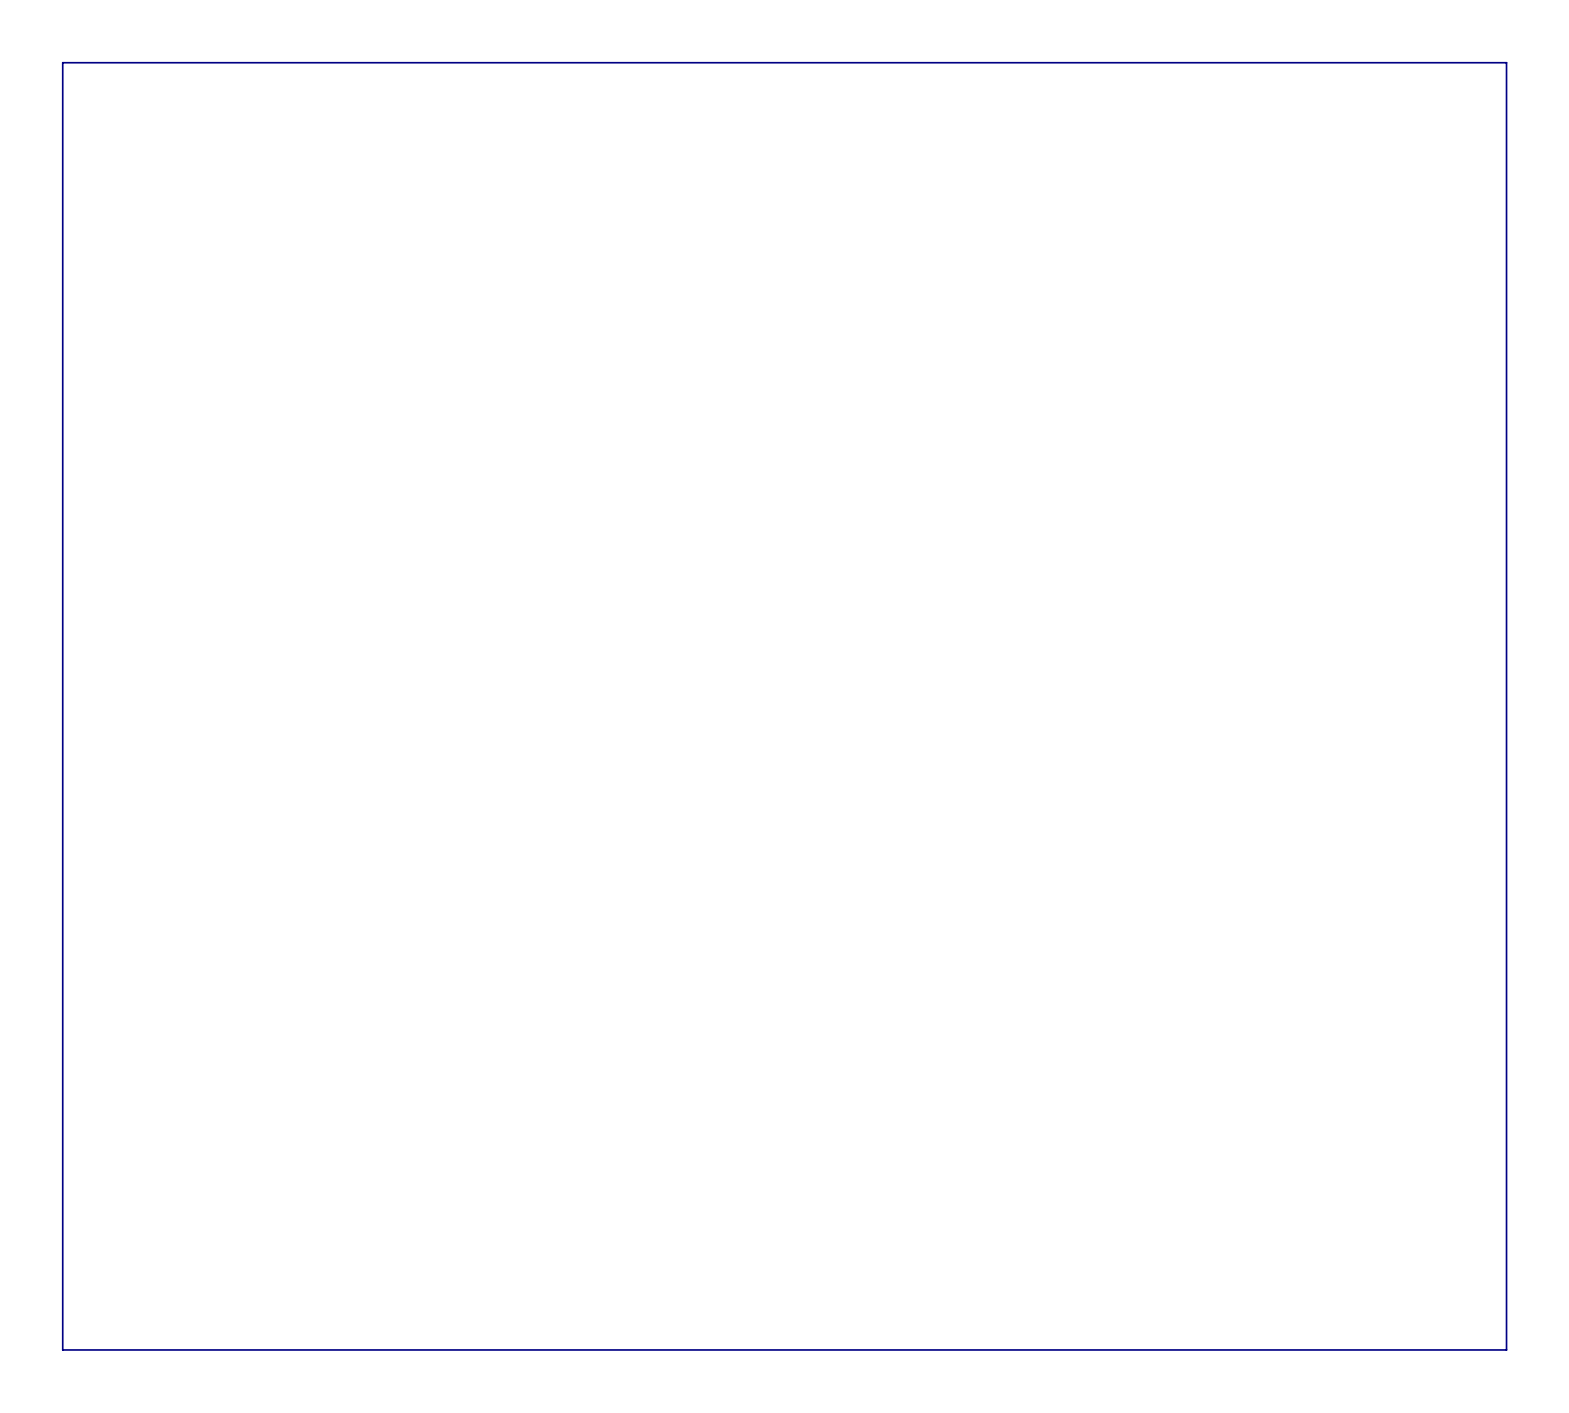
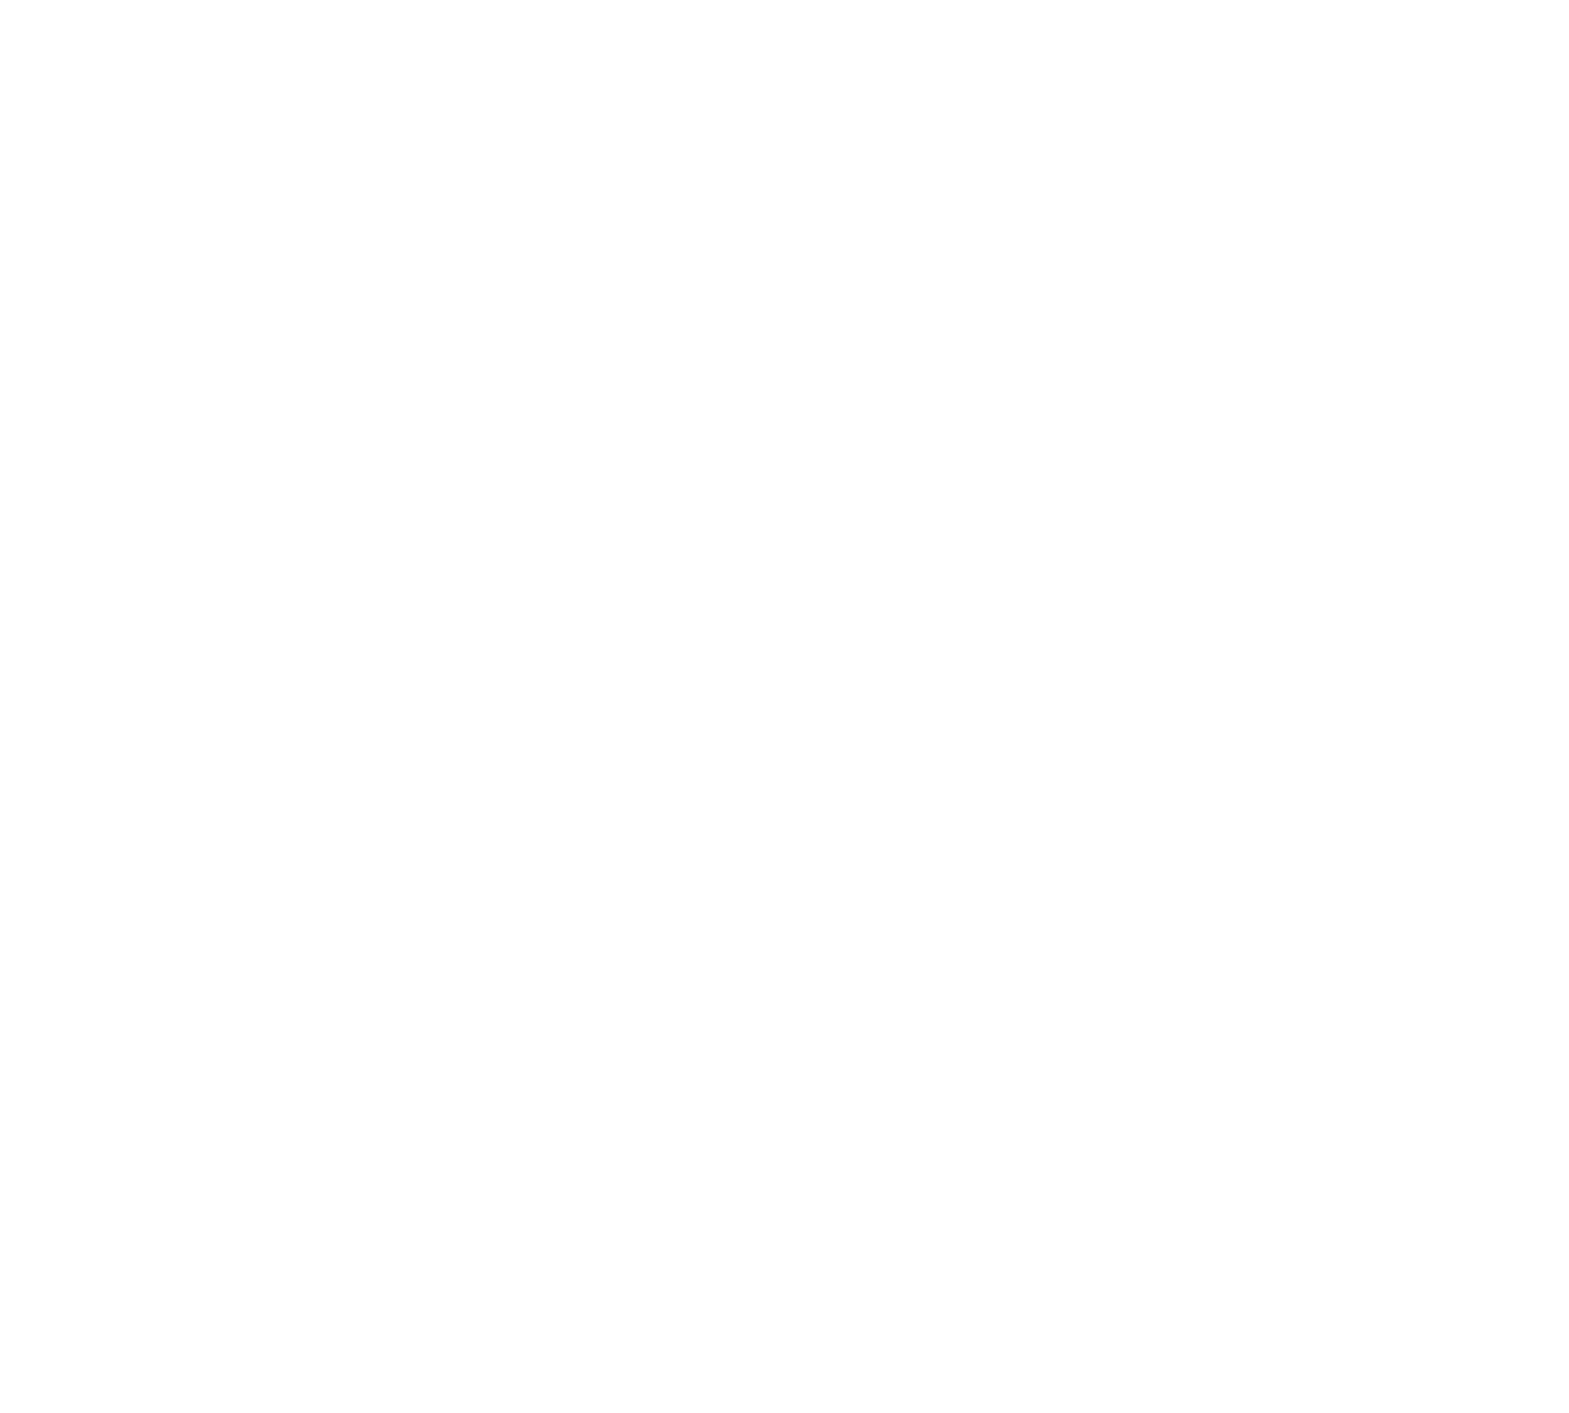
line: (62, 62) (1506, 62) (1506, 1349) (62, 1349) (62, 62) -> none

